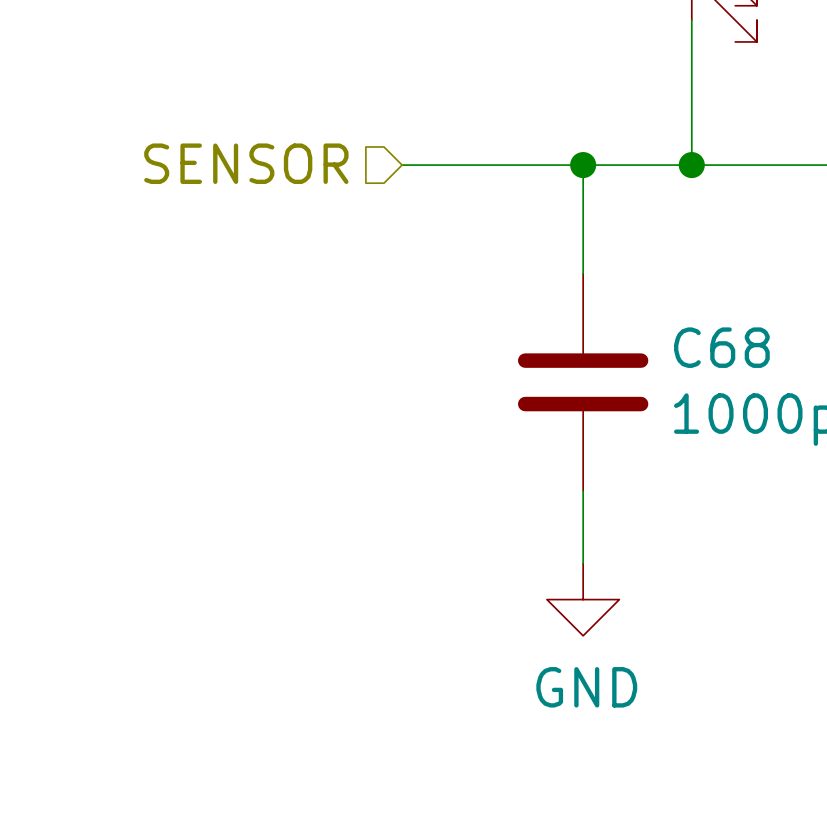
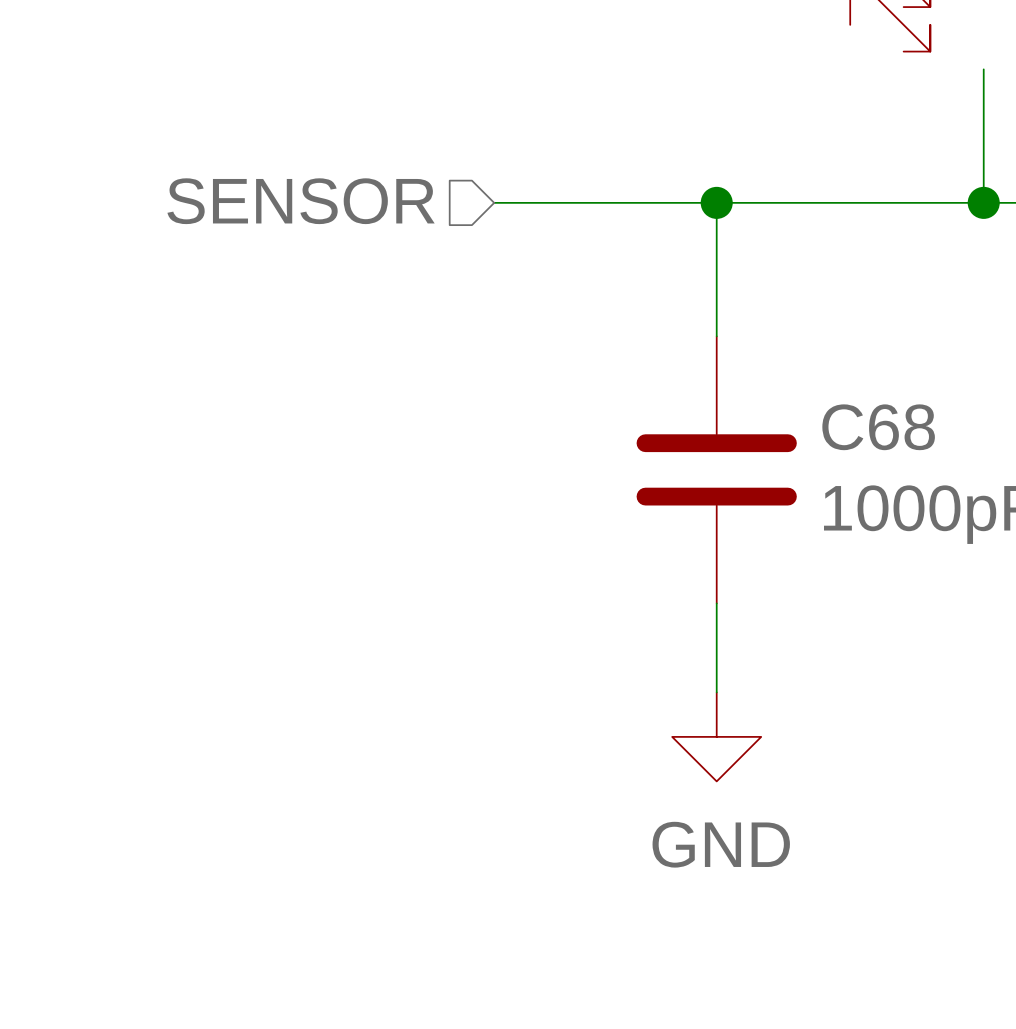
wire: (691, 20) (691, 165) -> none
wire: none -> (983, 69) (983, 202)
junction position: (691, 165) -> (983, 202)

